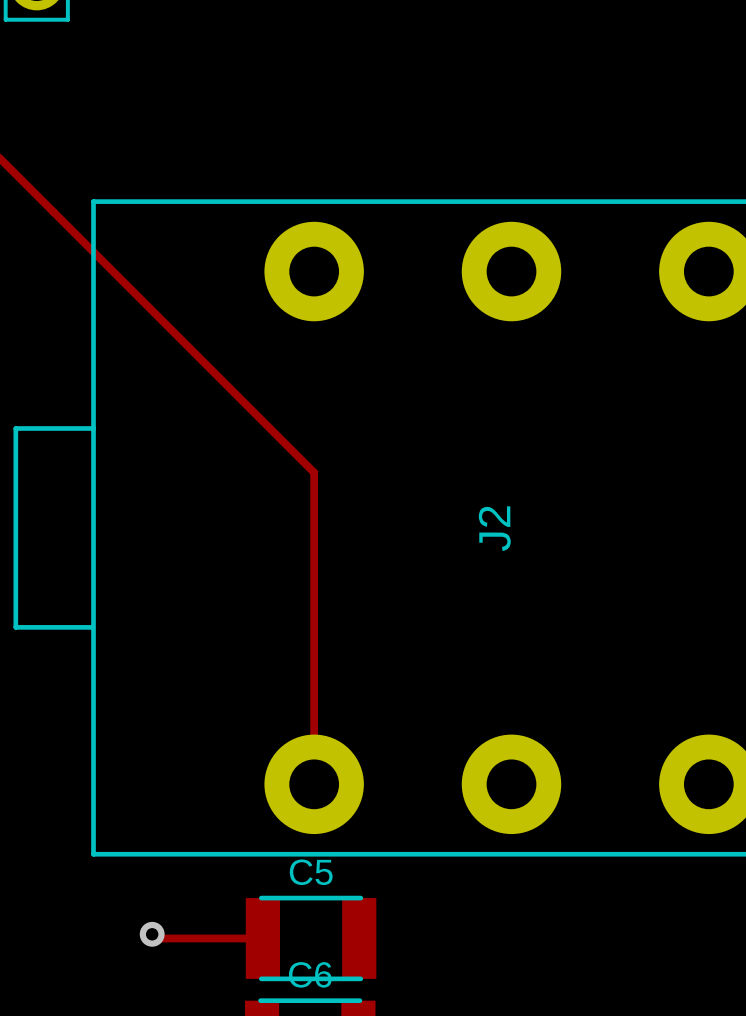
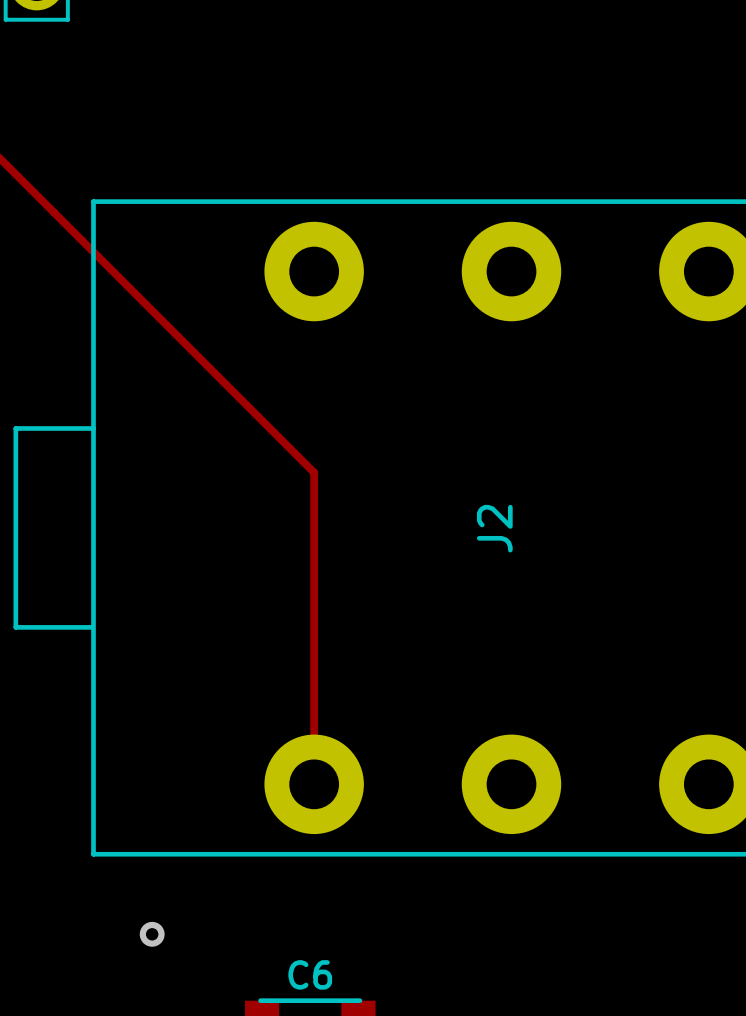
track: (152, 934) (156, 938) (262, 938) -> none
C5: (311, 938) -> none

